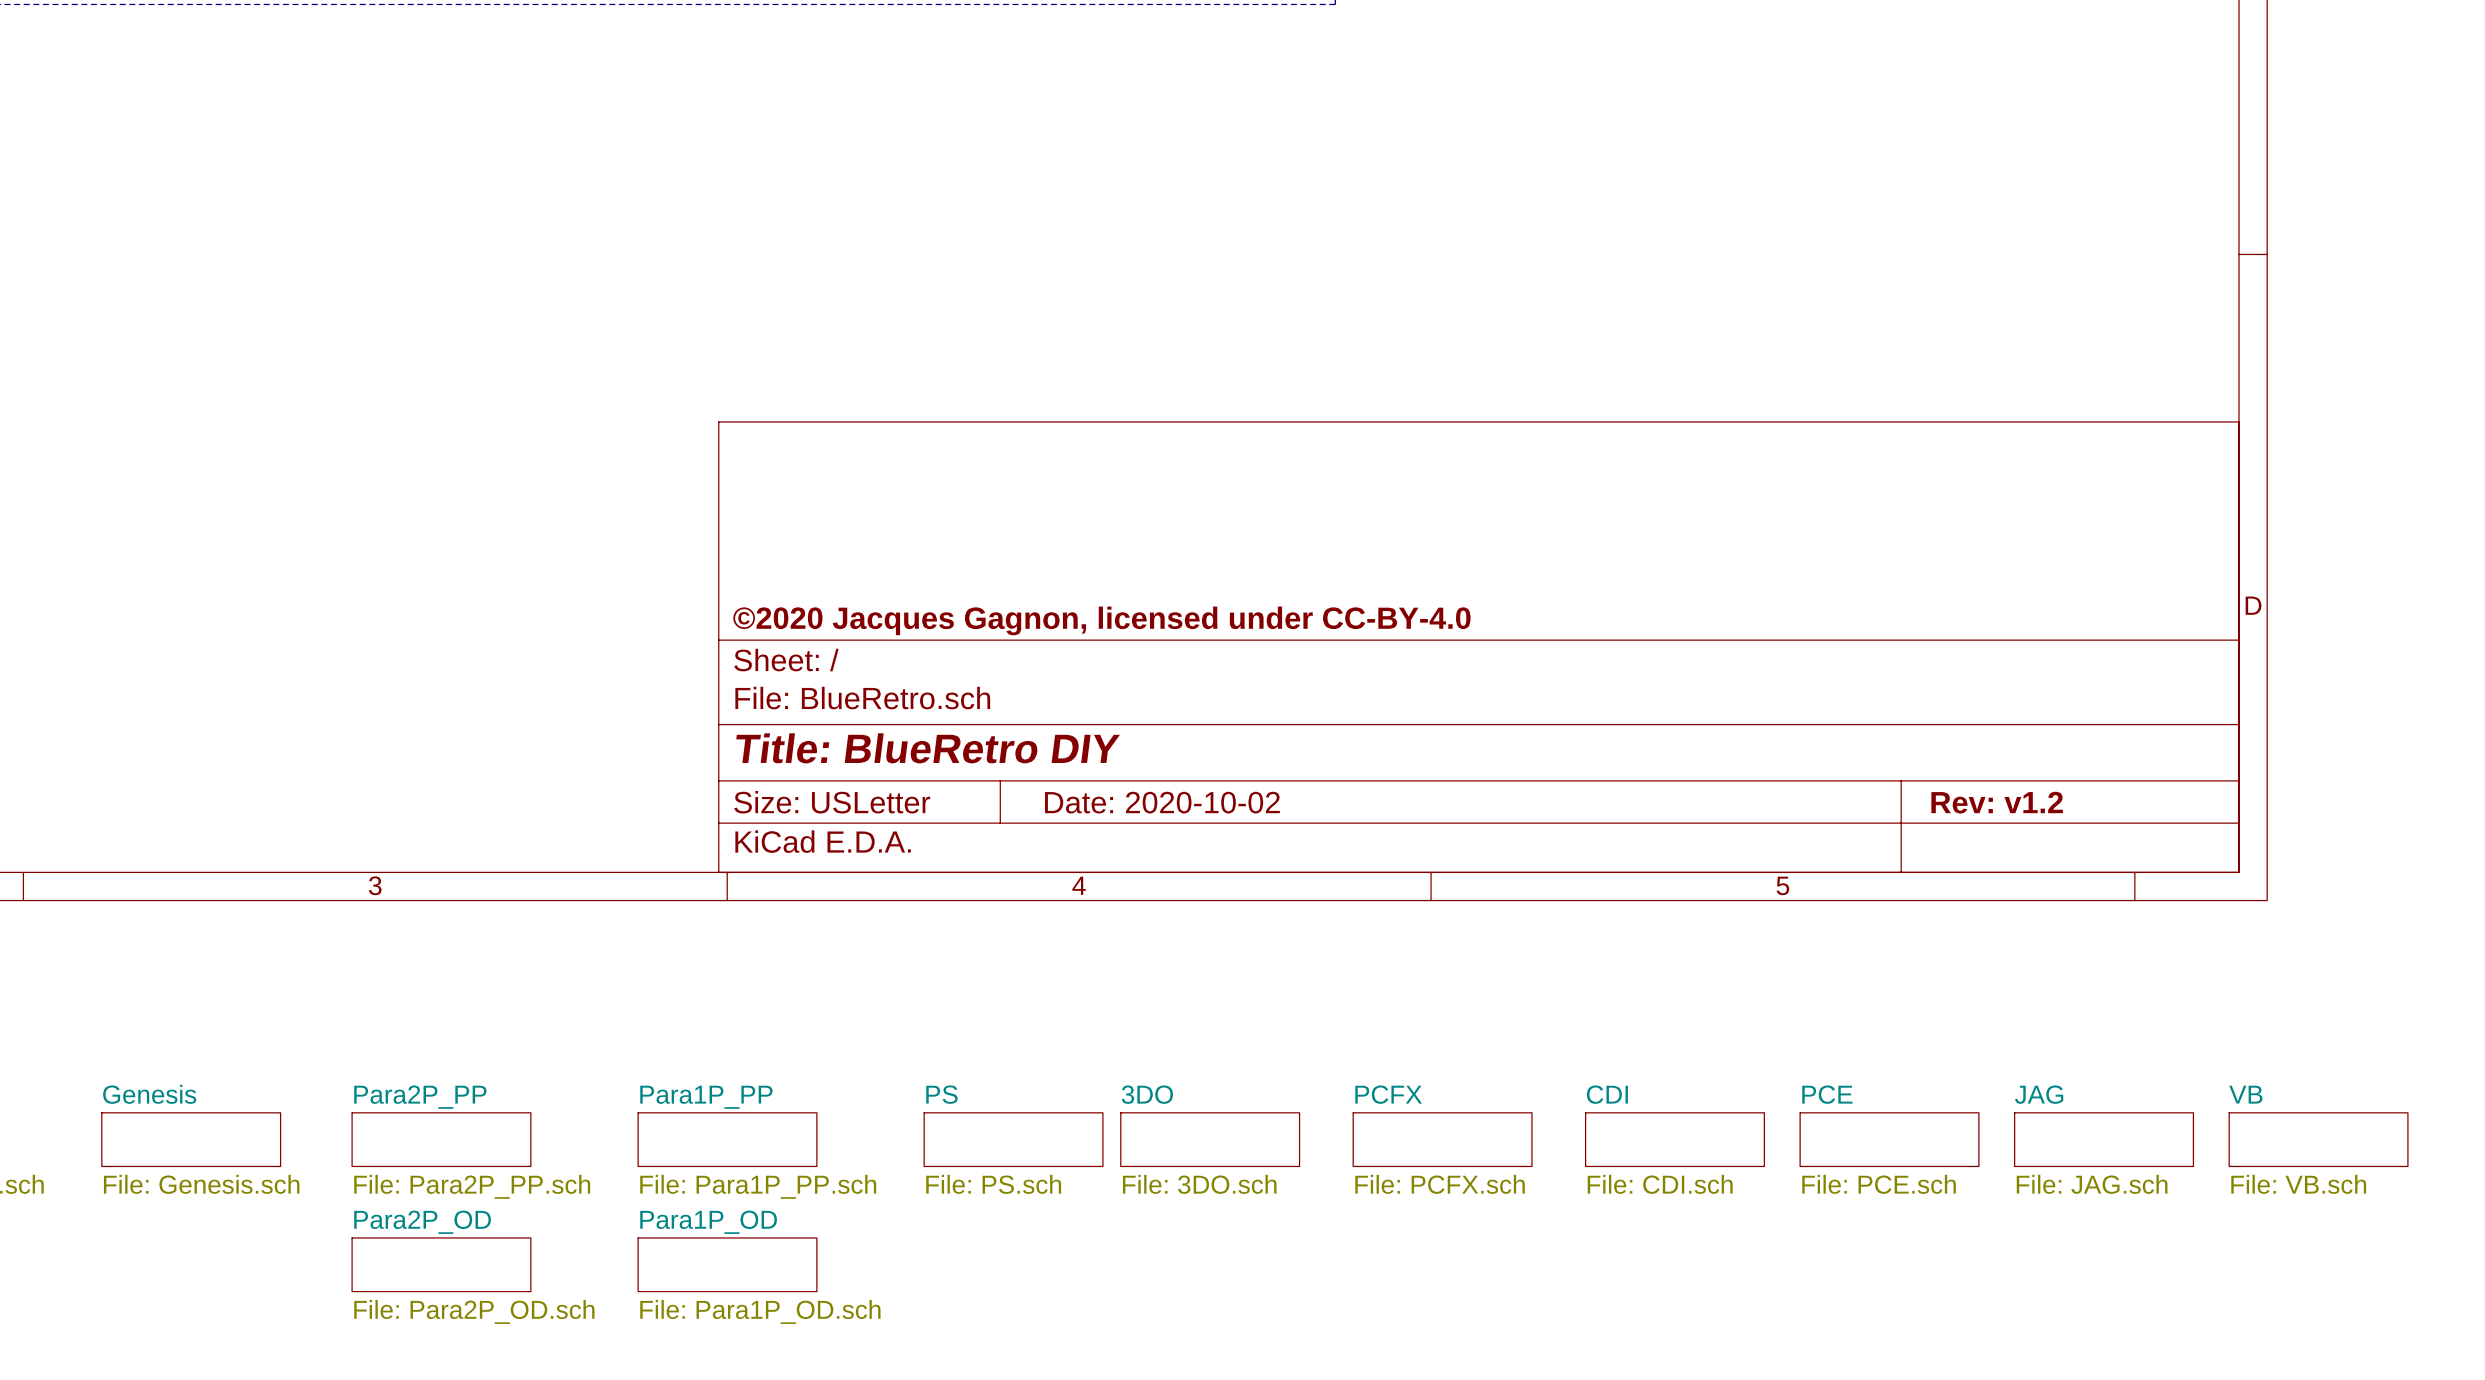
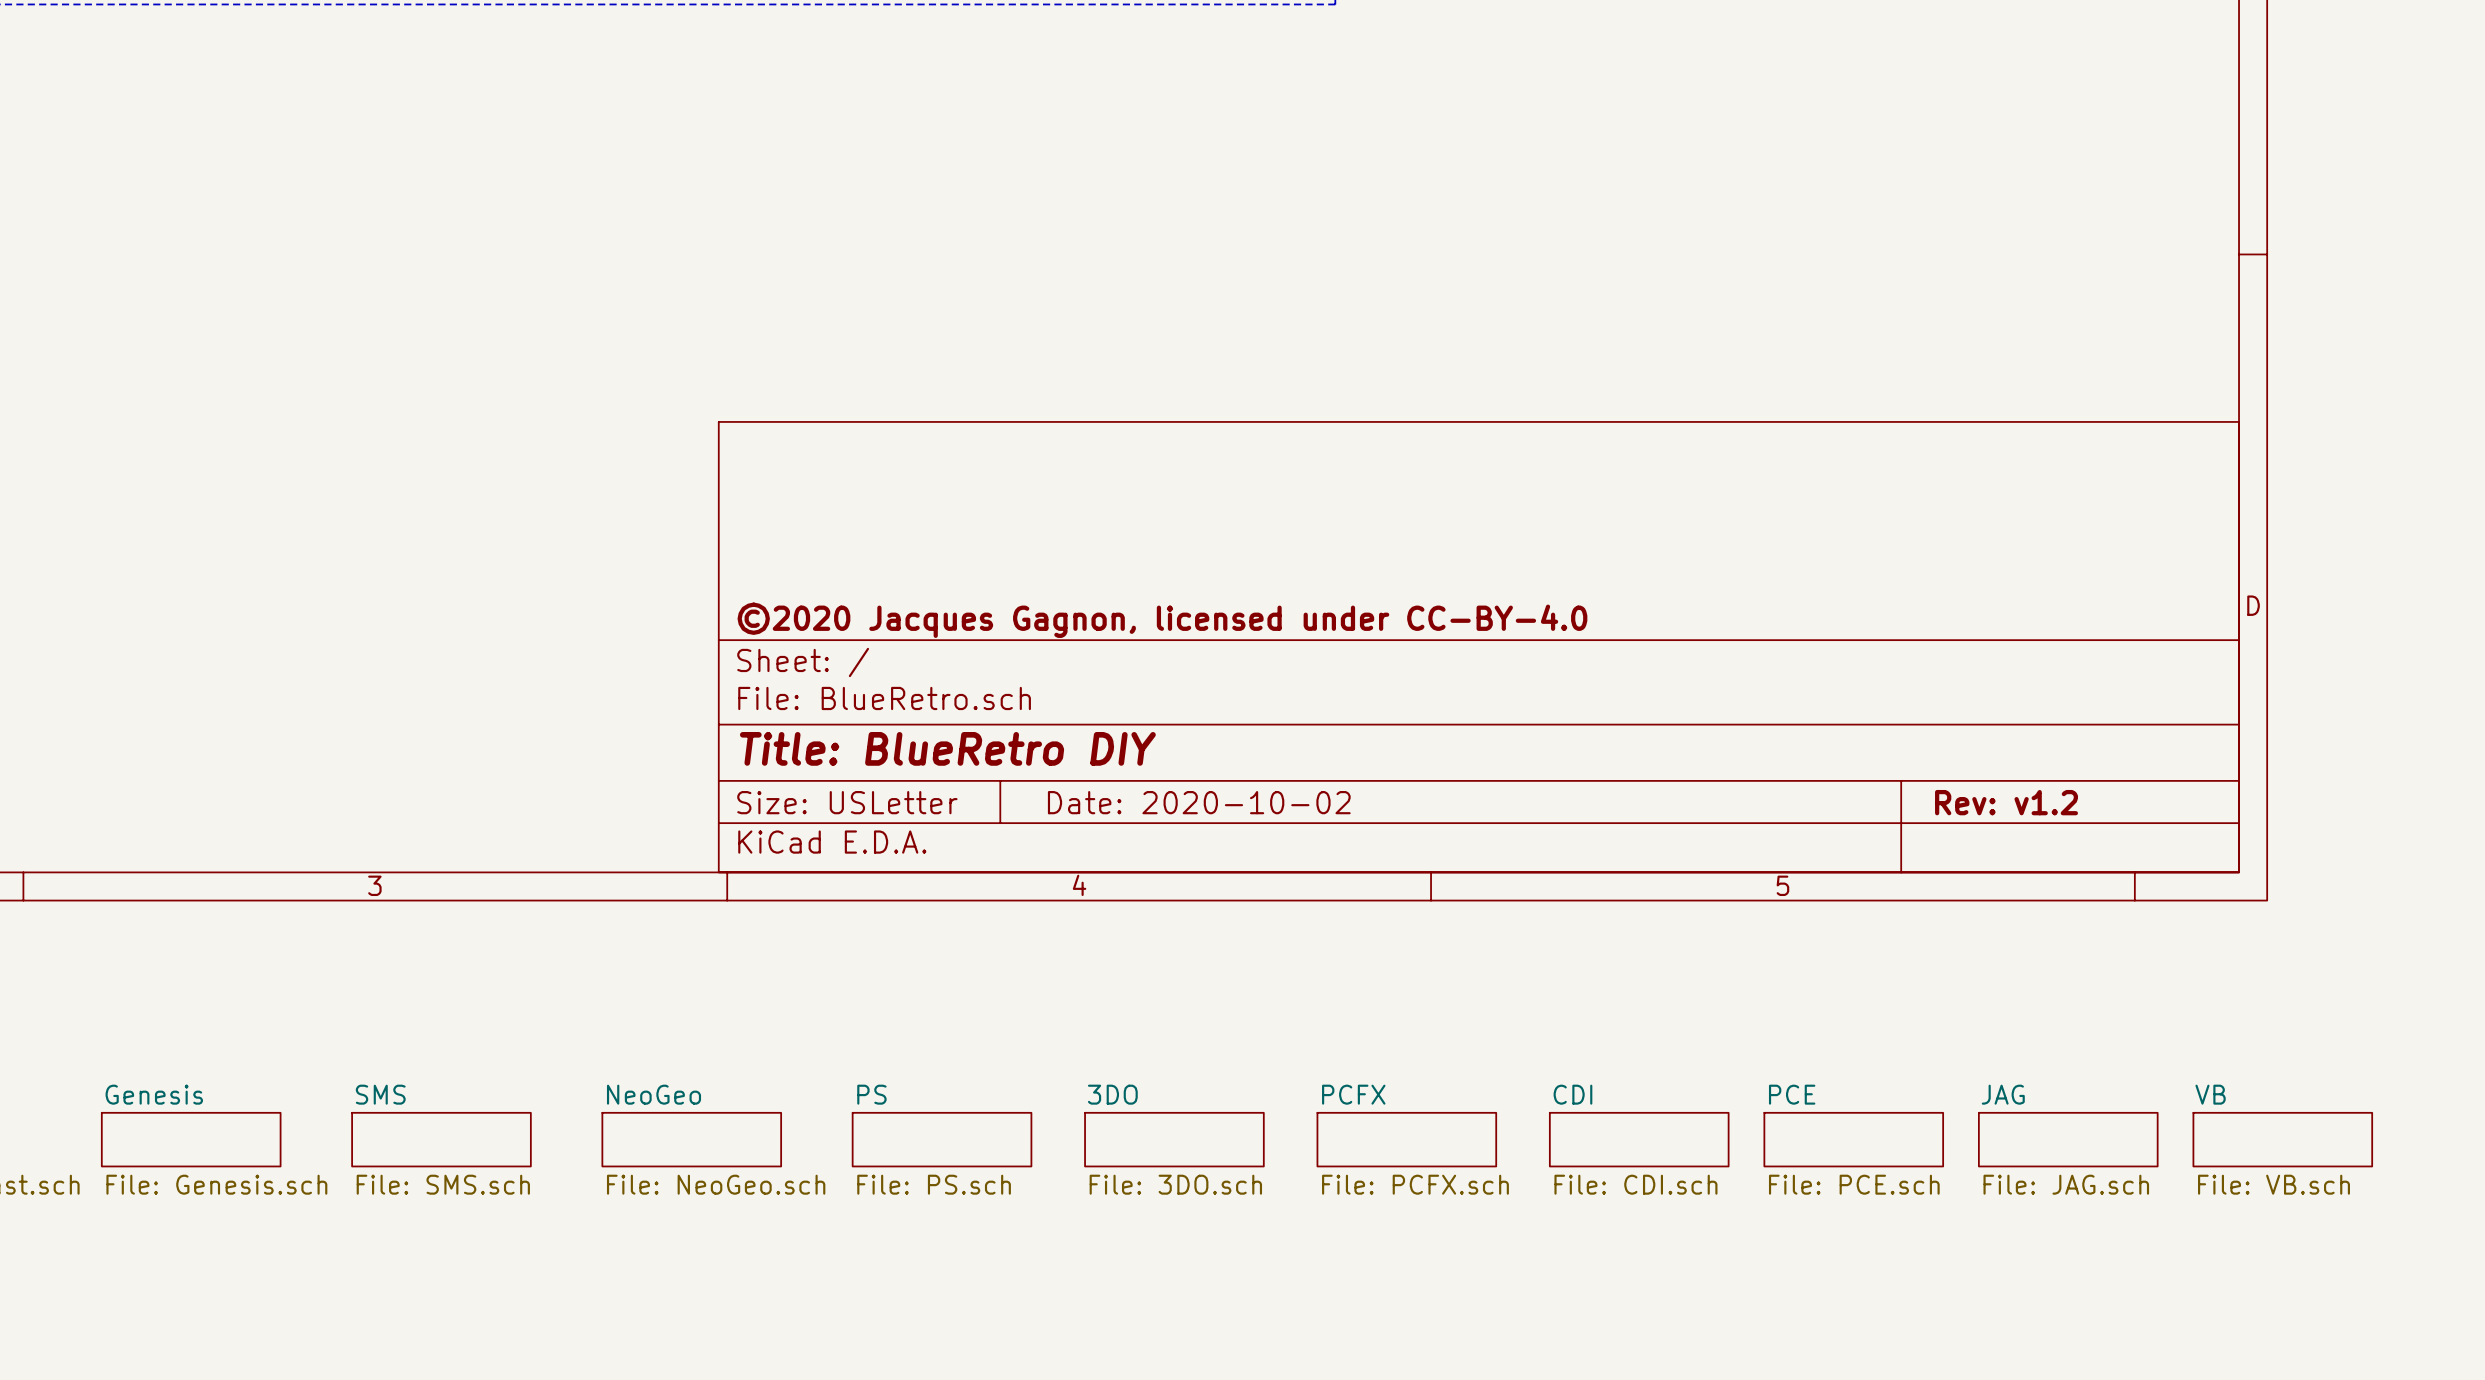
sheet Para2P_PP name: Para2P_PP (420, 1097) -> SMS (380, 1094)
sheet NeoGeo: none -> File: NeoGeo.sch (691, 1139)
sheet Para1P_PP: File: Para1P_PP.sch (727, 1139) -> none
sheet PS position: (1013, 1139) -> (942, 1139)
sheet 3DO position: (1210, 1139) -> (1174, 1139)
sheet PCFX position: (1442, 1139) -> (1406, 1139)
sheet CDI position: (1674, 1139) -> (1639, 1139)
sheet PCE position: (1889, 1139) -> (1853, 1139)
sheet JAG position: (2104, 1139) -> (2068, 1139)
sheet VB position: (2318, 1139) -> (2282, 1139)
sheet Para2P_PP value: File: Para2P_PP.sch (472, 1186) -> File: SMS.sch (443, 1184)
sheet Para2P_OD: File: Para2P_OD.sch (441, 1264) -> none
sheet Para1P_OD: File: Para1P_OD.sch (727, 1264) -> none

